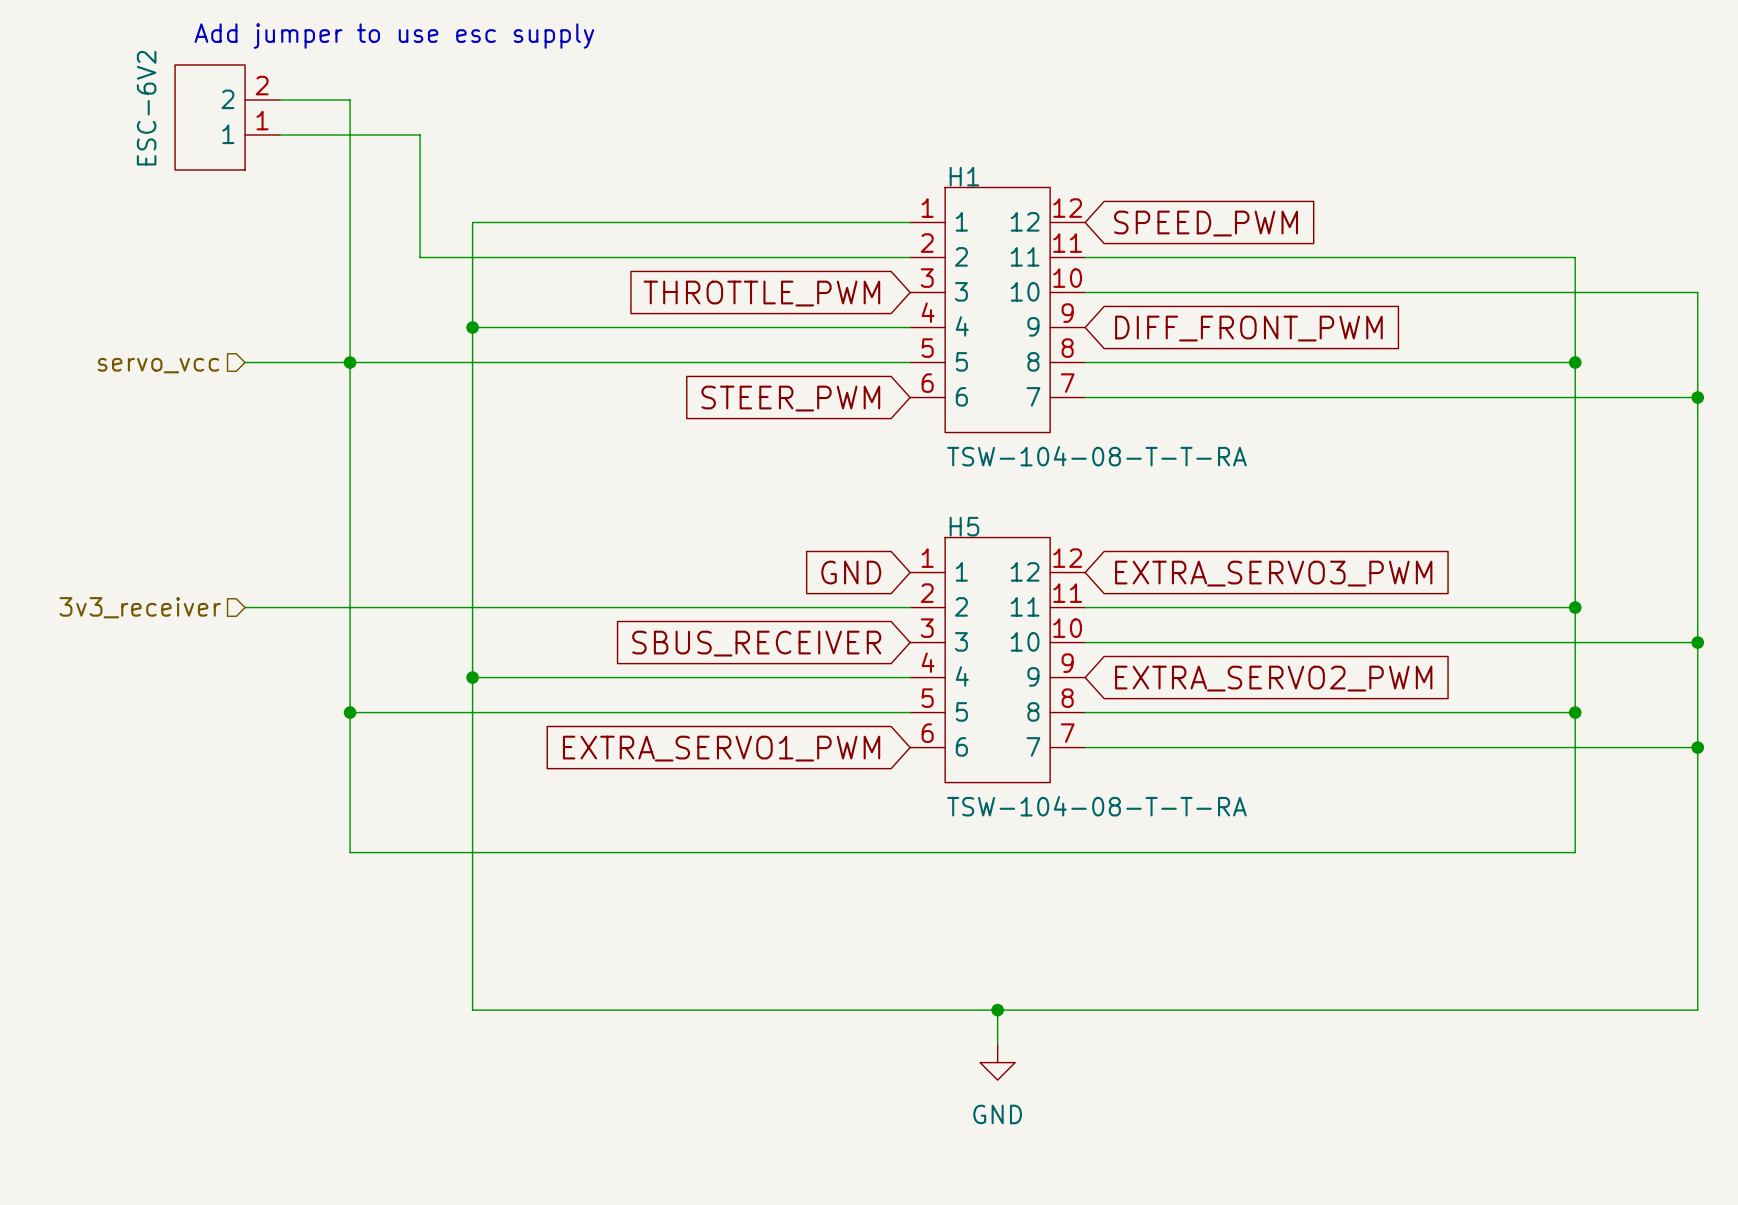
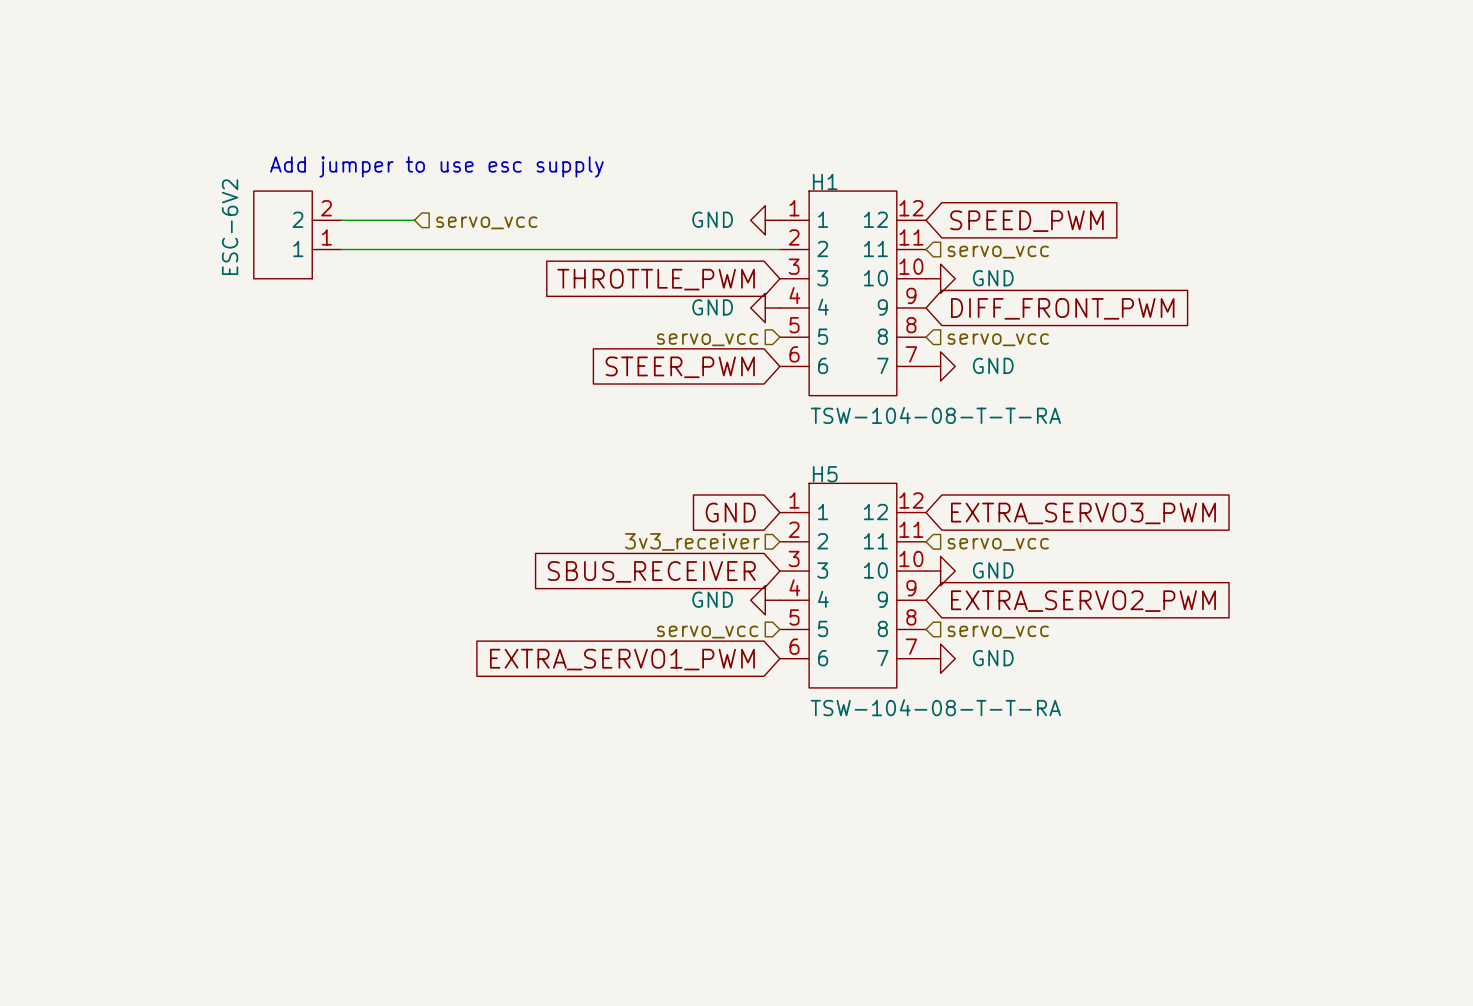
text position: Add jumper to use esc supply (394, 36) -> Add jumper to use esc supply (436, 166)
wire: (280, 99) (350, 99) (350, 852) (1575, 852) (1575, 257) (1085, 257) -> none
ESC-6V2 position: (227, 117) -> (297, 234)
wire: (280, 134) (420, 134) (420, 257) -> (341, 249) (370, 249)
wire: none -> (341, 220) (414, 220)
power symbol: none -> GND (765, 220)
wire: (910, 222) (472, 222) (472, 1010) (1697, 1010) (1697, 292) (1085, 292) -> none
hierarchical label: none -> servo_vcc (998, 252)
power symbol: none -> GND (940, 278)
wire: (472, 327) (910, 327) -> none
junction: (472, 327) -> none
power symbol: none -> GND (765, 307)
wire: (245, 362) (910, 362) -> none
junction: (350, 362) -> none
wire: (1085, 362) (1575, 362) -> none
junction: (1575, 362) -> none
hierarchical label rotation: 0° (158, 365) -> 180° (486, 222)
hierarchical label position: servo_vcc (158, 365) -> servo_vcc (486, 222)
hierarchical label: none -> servo_vcc (707, 339)
hierarchical label: none -> servo_vcc (998, 339)
wire: (1085, 397) (1697, 397) -> none
power symbol: none -> GND (940, 366)
junction: (1697, 397) -> none
hierarchical label: 3v3_receiver (140, 607) -> none
wire: (245, 607) (910, 607) -> none
hierarchical label: none -> 3v3_receiver (692, 541)
wire: (1085, 607) (1575, 607) -> none
junction: (1575, 607) -> none
hierarchical label: none -> servo_vcc (998, 544)
wire: (1085, 642) (1697, 642) -> none
power symbol: none -> GND (940, 571)
junction: (1697, 642) -> none
wire: (472, 677) (910, 677) -> none
junction: (472, 677) -> none
power symbol: none -> GND (765, 600)
wire: (350, 712) (910, 712) -> none
junction: (350, 712) -> none
wire: (1085, 712) (1575, 712) -> none
junction: (1575, 712) -> none
hierarchical label: none -> servo_vcc (707, 632)
hierarchical label: none -> servo_vcc (998, 632)
wire: (1085, 747) (1697, 747) -> none
power symbol: none -> GND (940, 658)
junction: (1697, 747) -> none
wire: (997, 1010) (997, 1045) -> none
junction: (997, 1010) -> none
power symbol: GND (997, 1062) -> none

